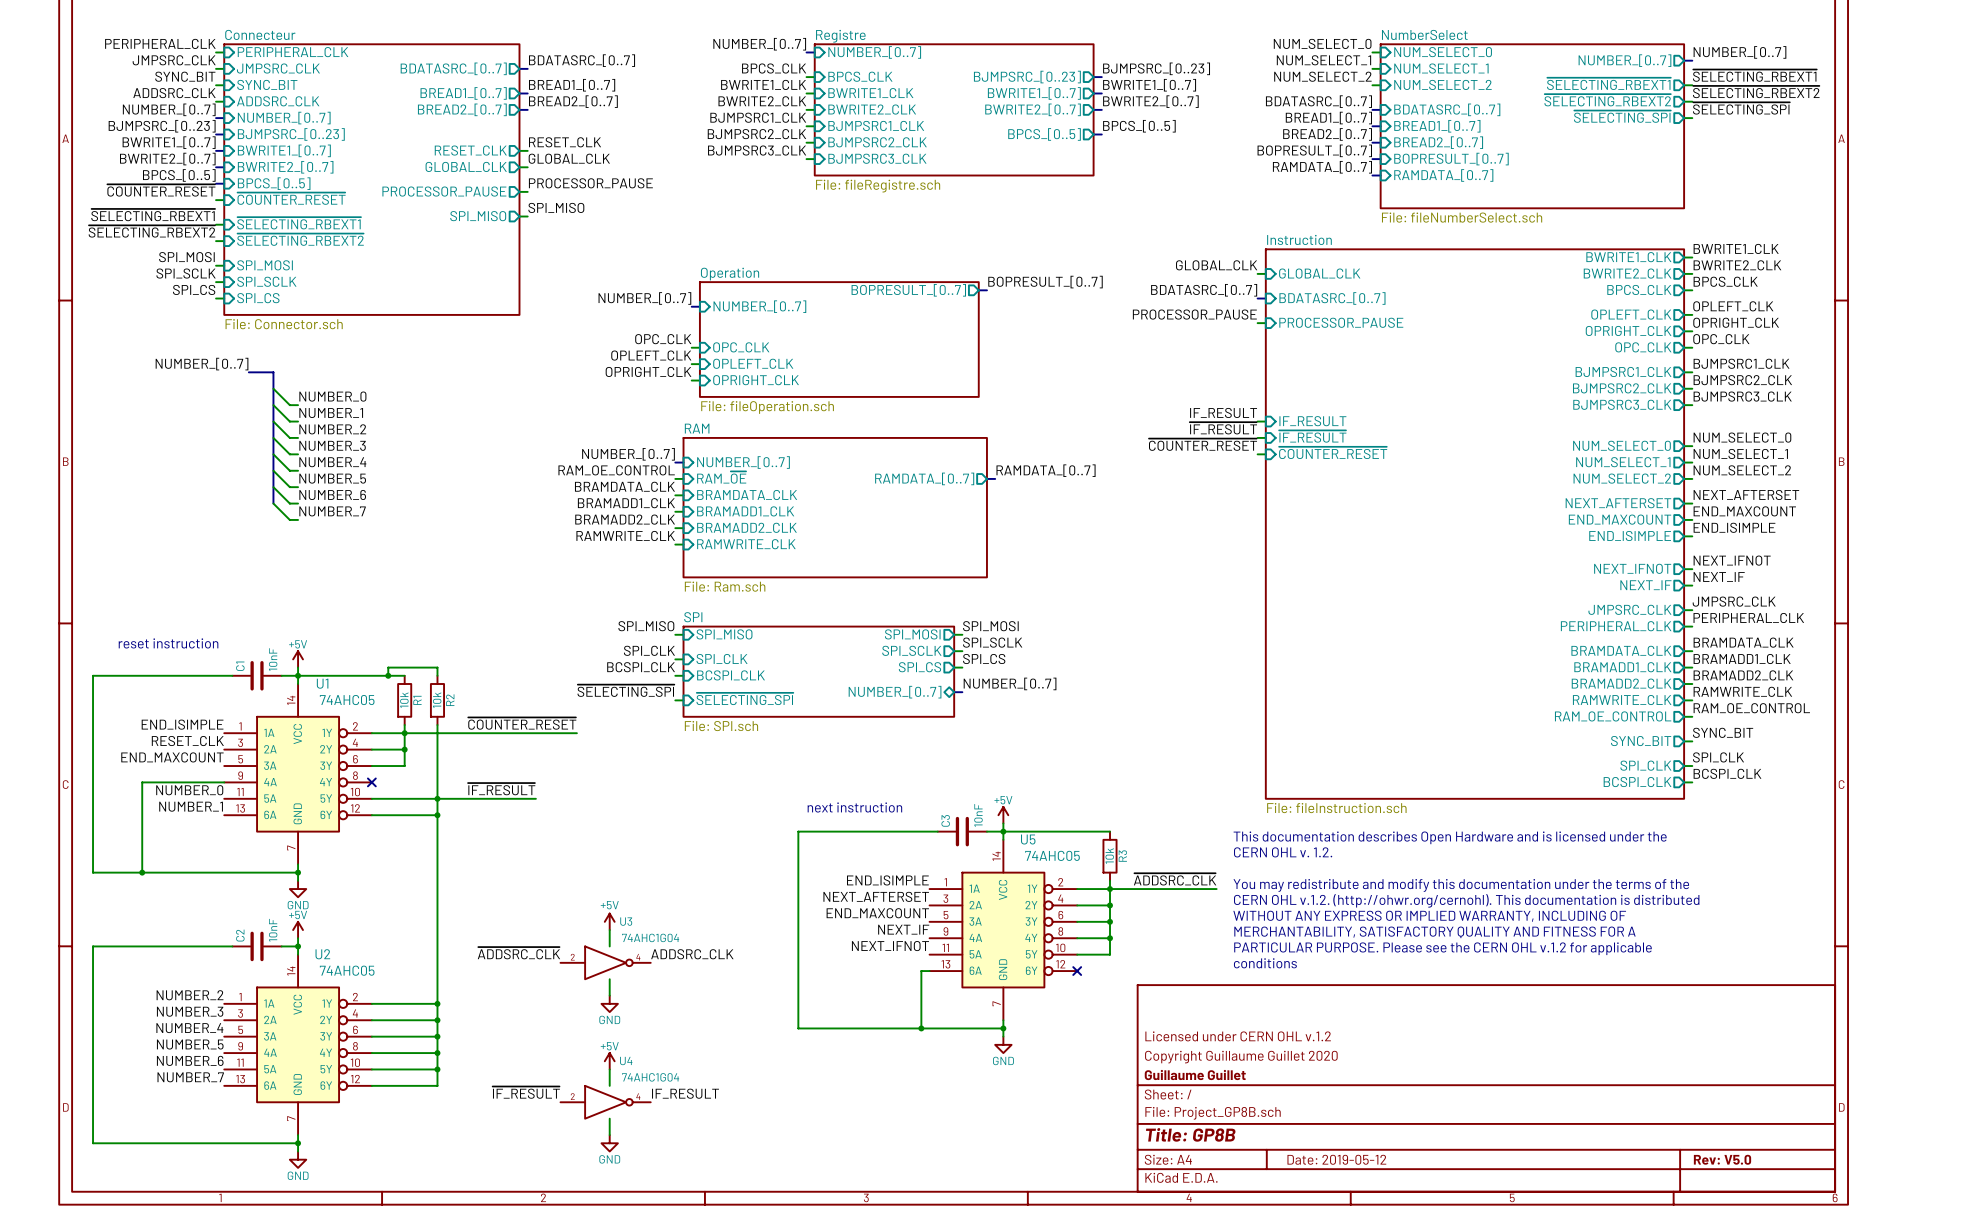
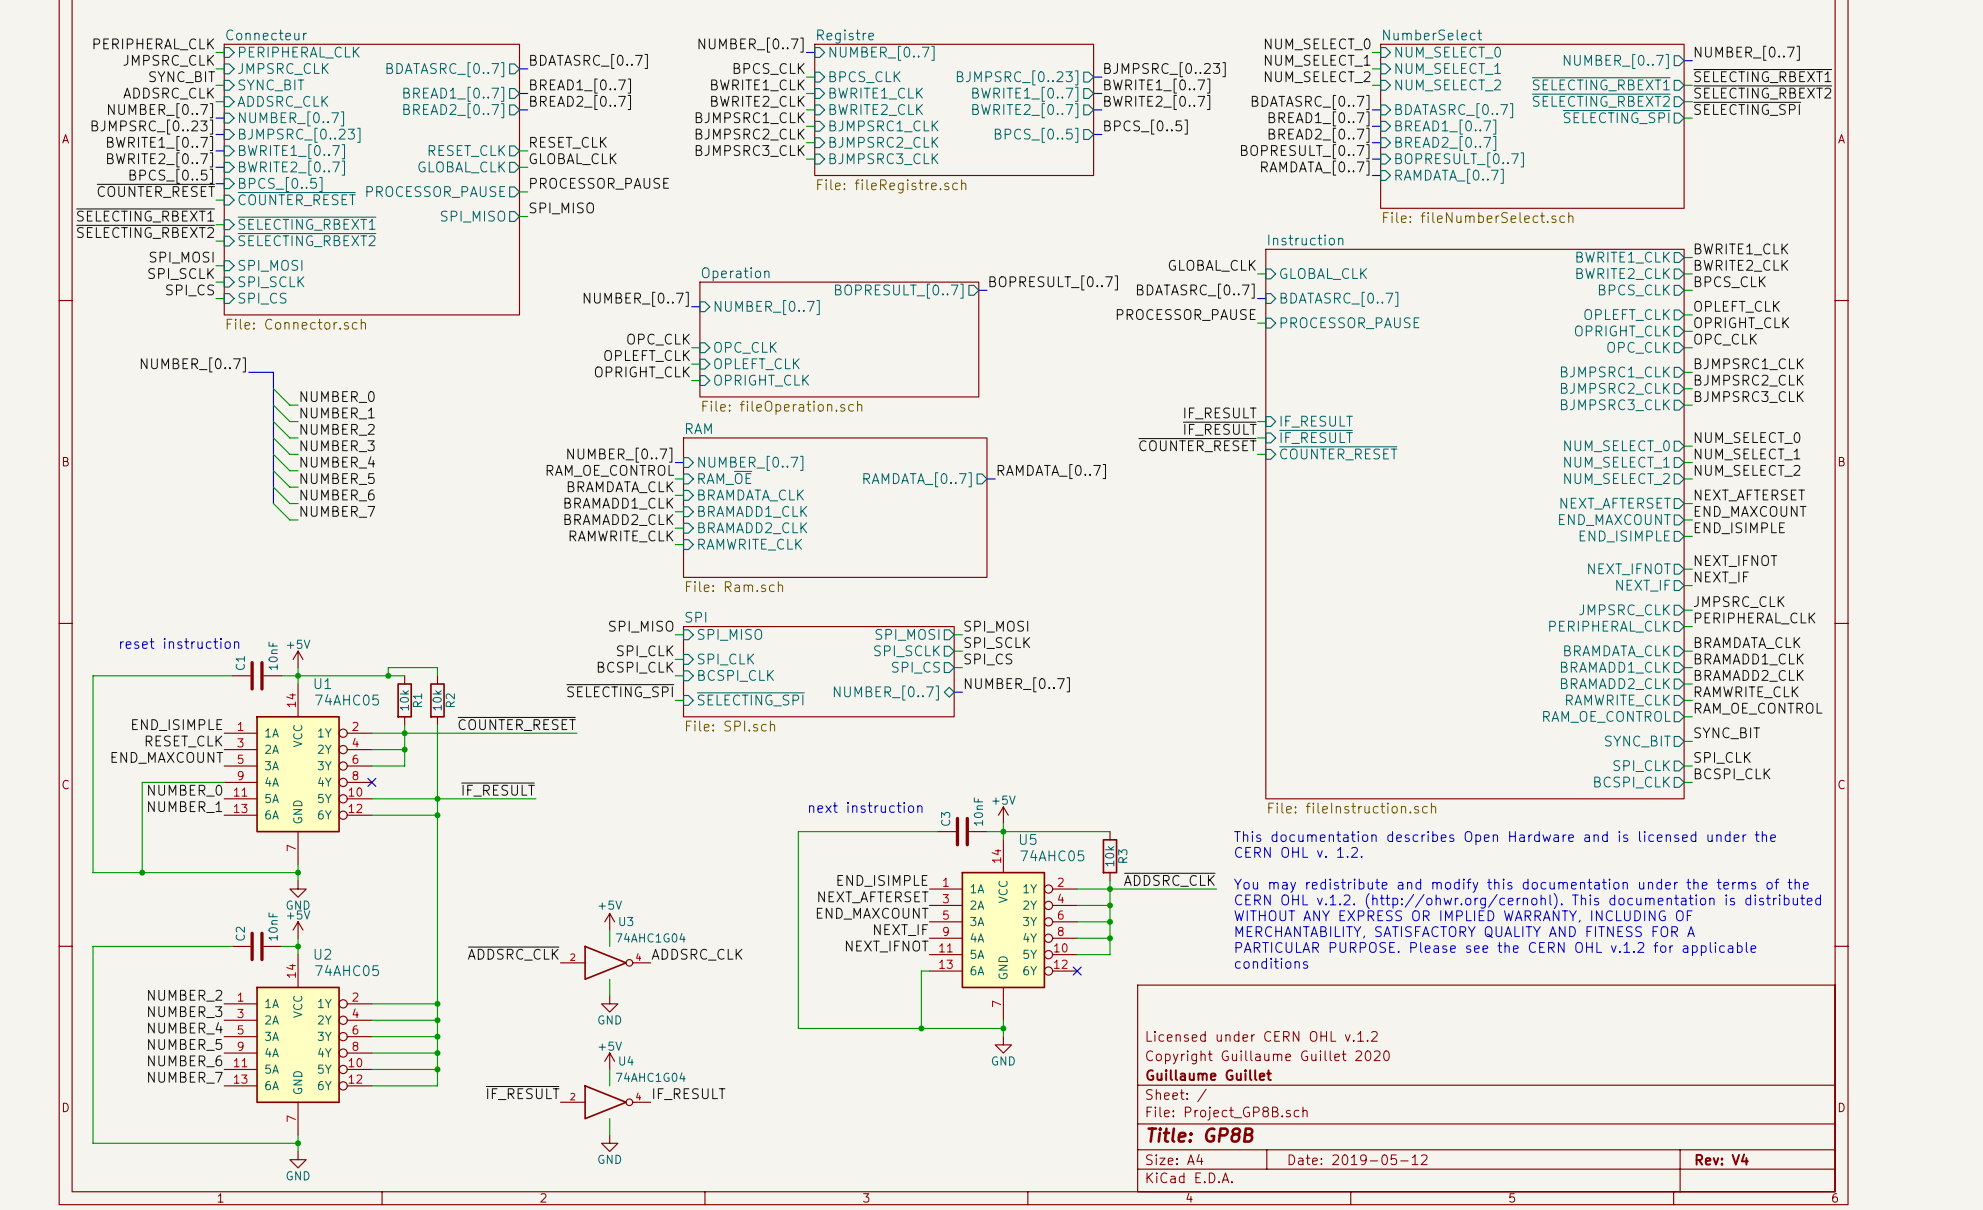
title block: Rev: V5.0 (1722, 1159) -> Rev: V4 (1722, 1159)

